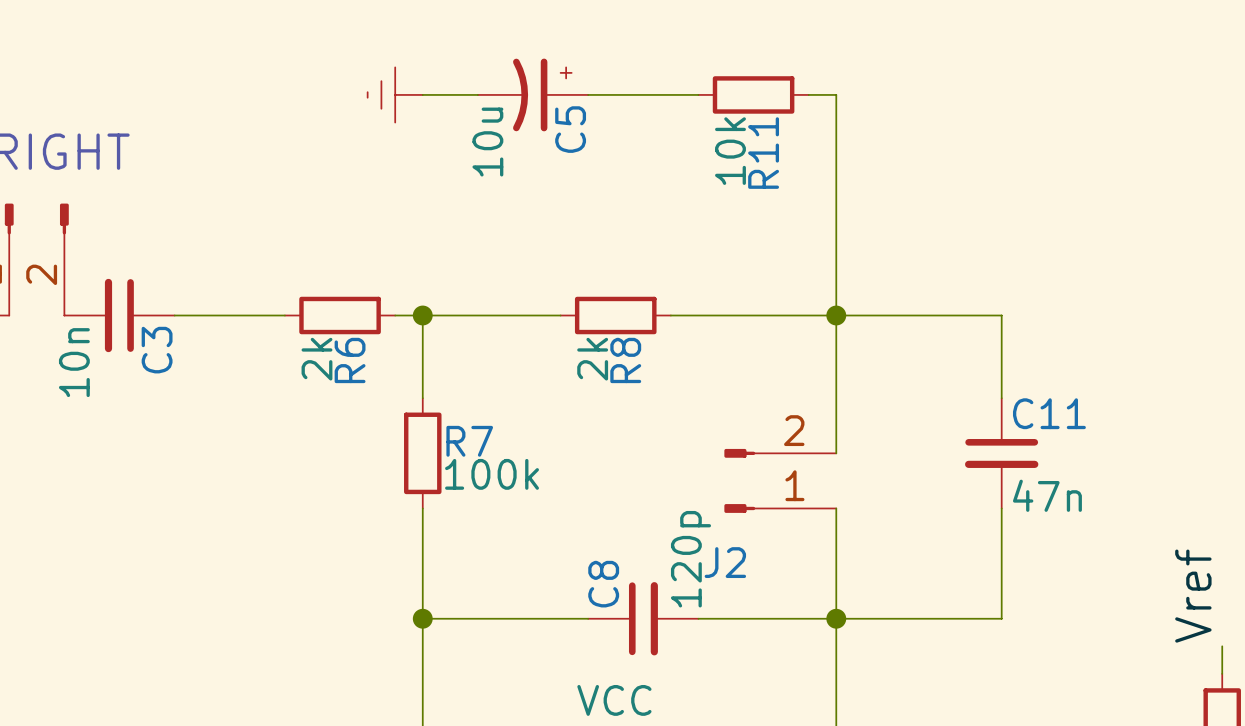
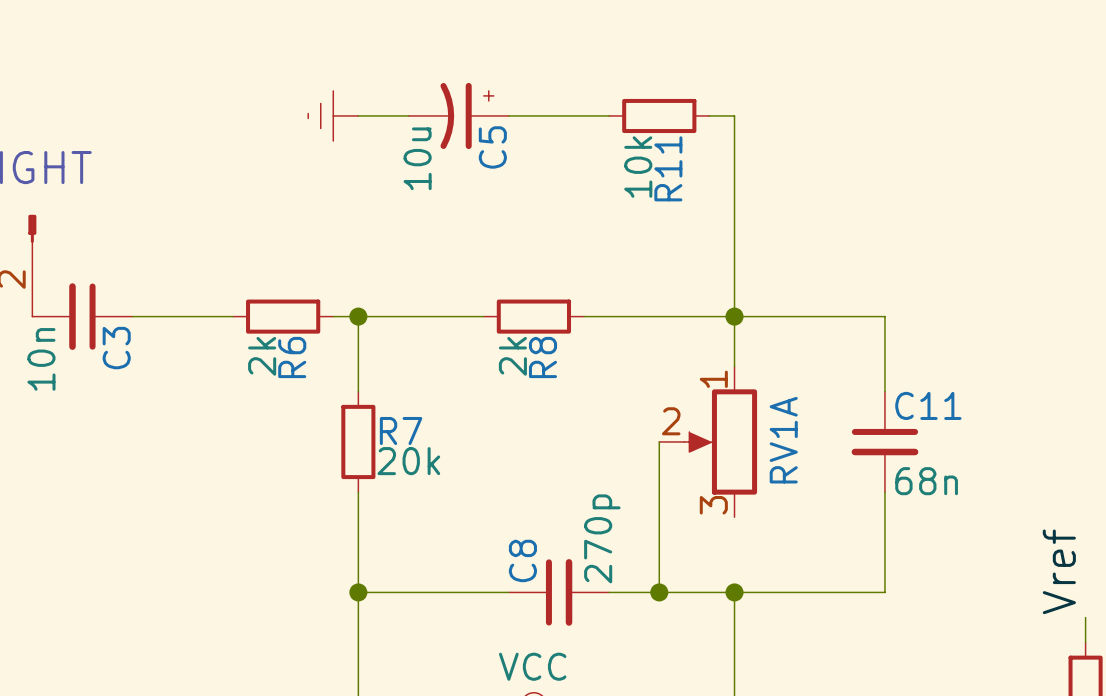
wire: (836, 370) (836, 453) -> none
wire: none -> (659, 441) (659, 592)
RV1A: none -> (708, 441)
R7 value: 100k (492, 474) -> 20k (408, 461)
J2: (780, 480) -> none
C11 value: 47n (1047, 495) -> 68n (926, 481)
wire: (836, 508) (836, 618) -> none
C8 value: 120p (690, 559) -> 270p (602, 538)
junction: none -> (659, 592)

